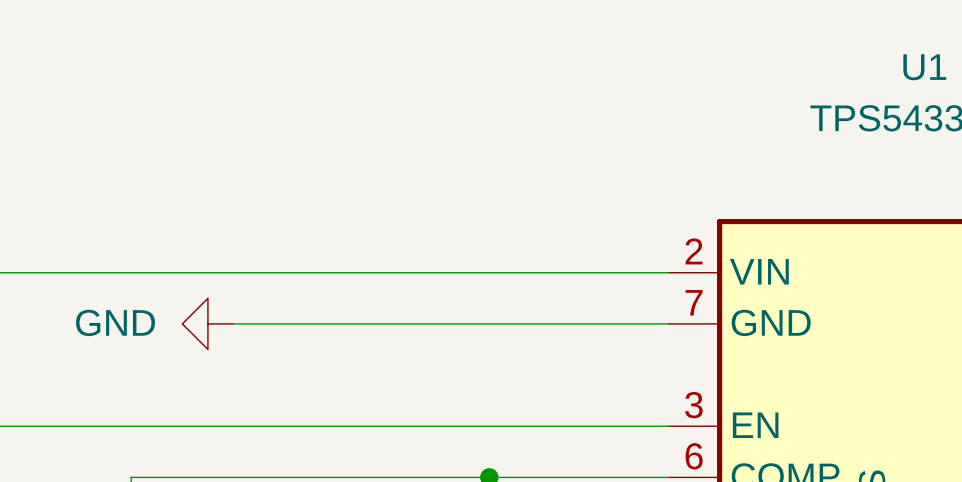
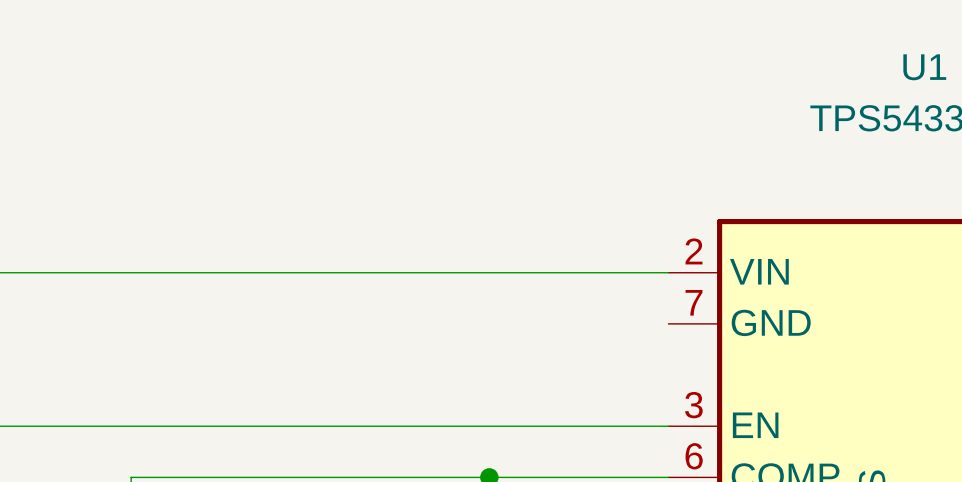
power symbol: GND (207, 323) -> none
wire: (233, 323) (668, 323) -> none

